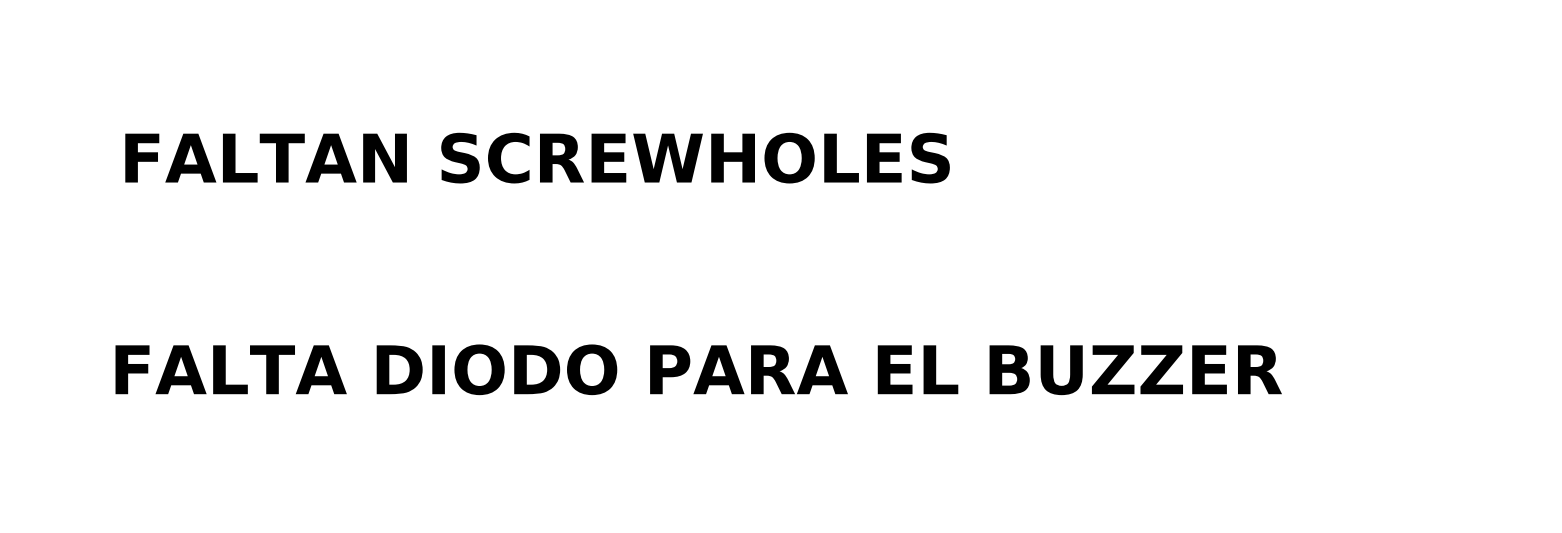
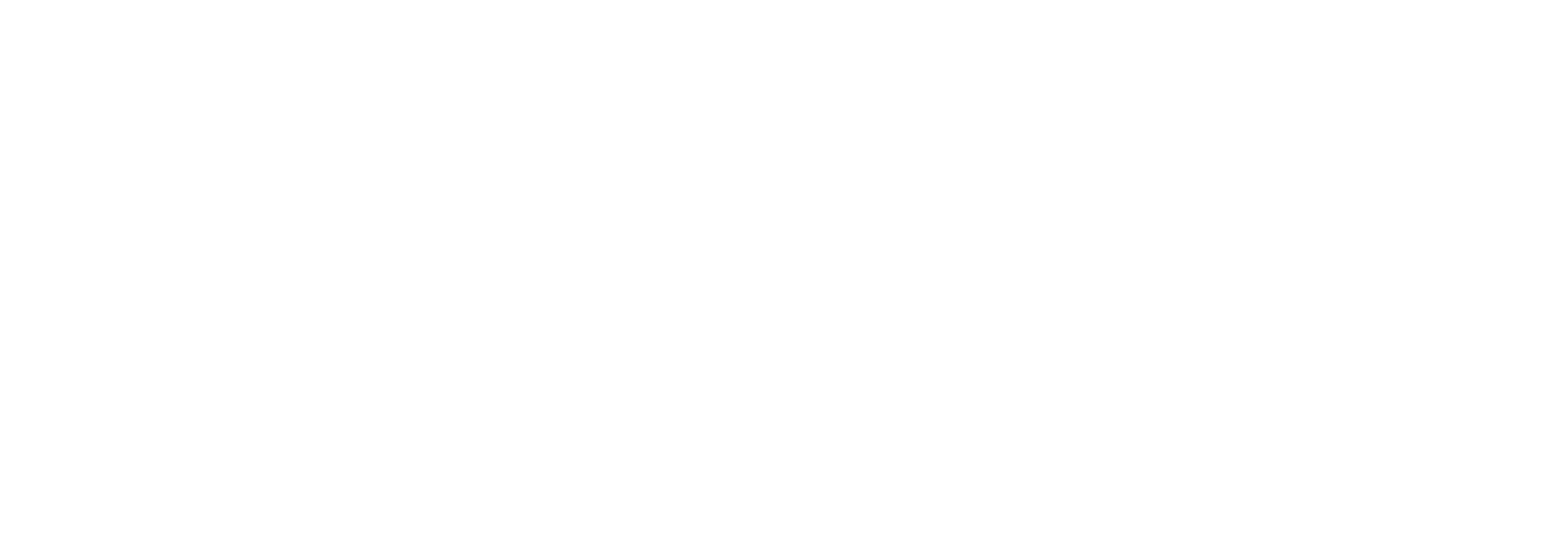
text: FALTAN SCREWHOLES (537, 158) -> none
text: FALTA DIODO PARA EL BUZZER (698, 369) -> none

